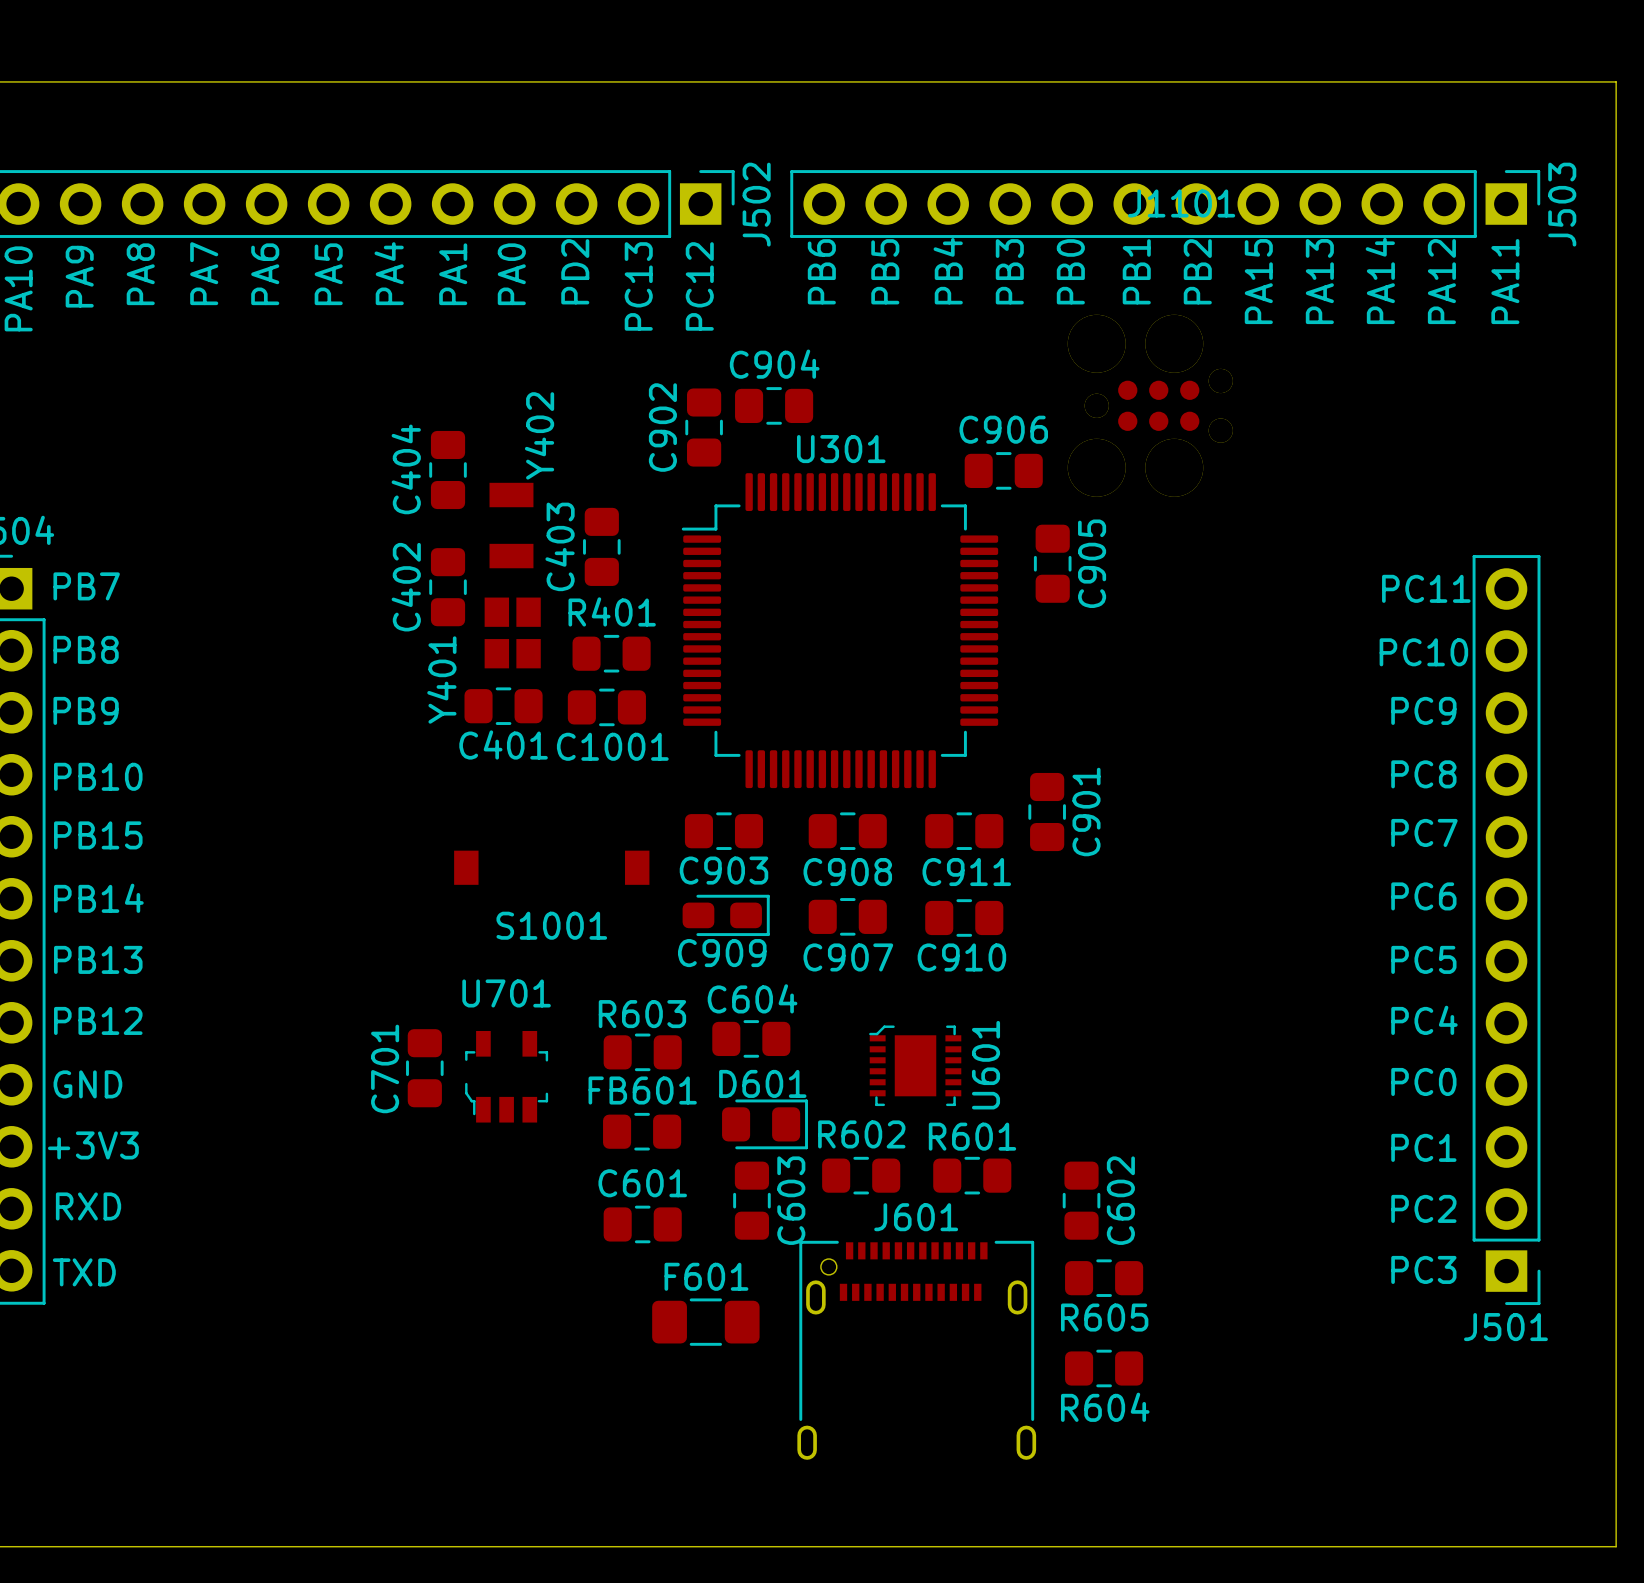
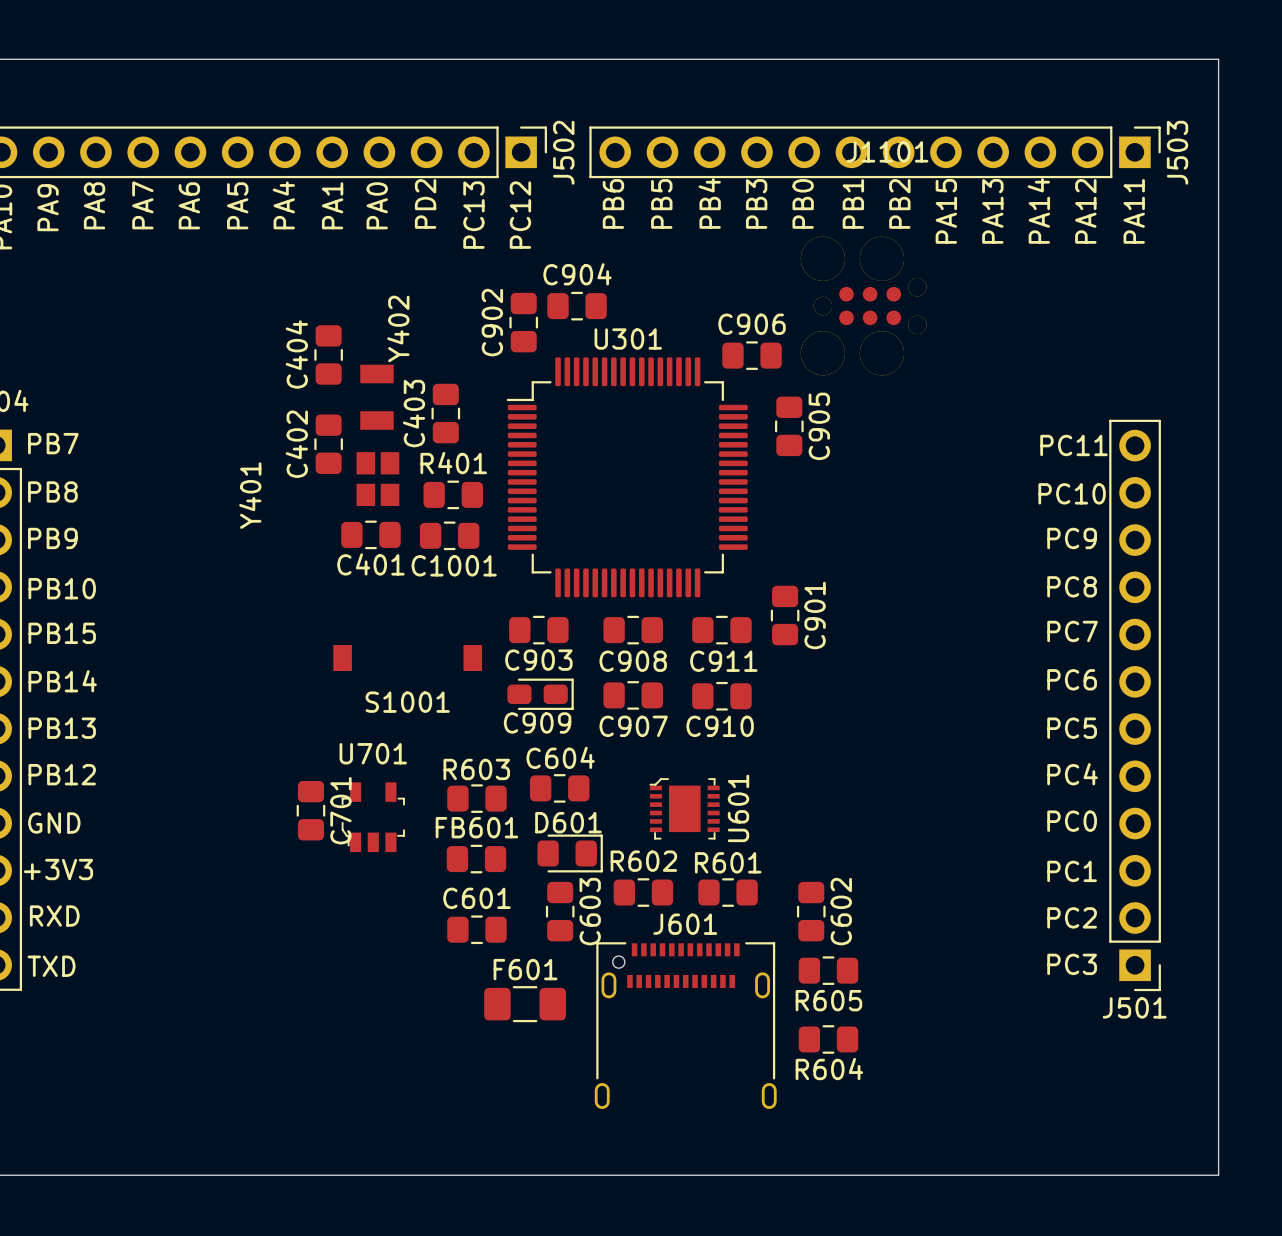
Y401 name position: Y401 (441, 680) -> Y401 (250, 495)
C701 name position: C701 (385, 1068) -> C701 (340, 810)

